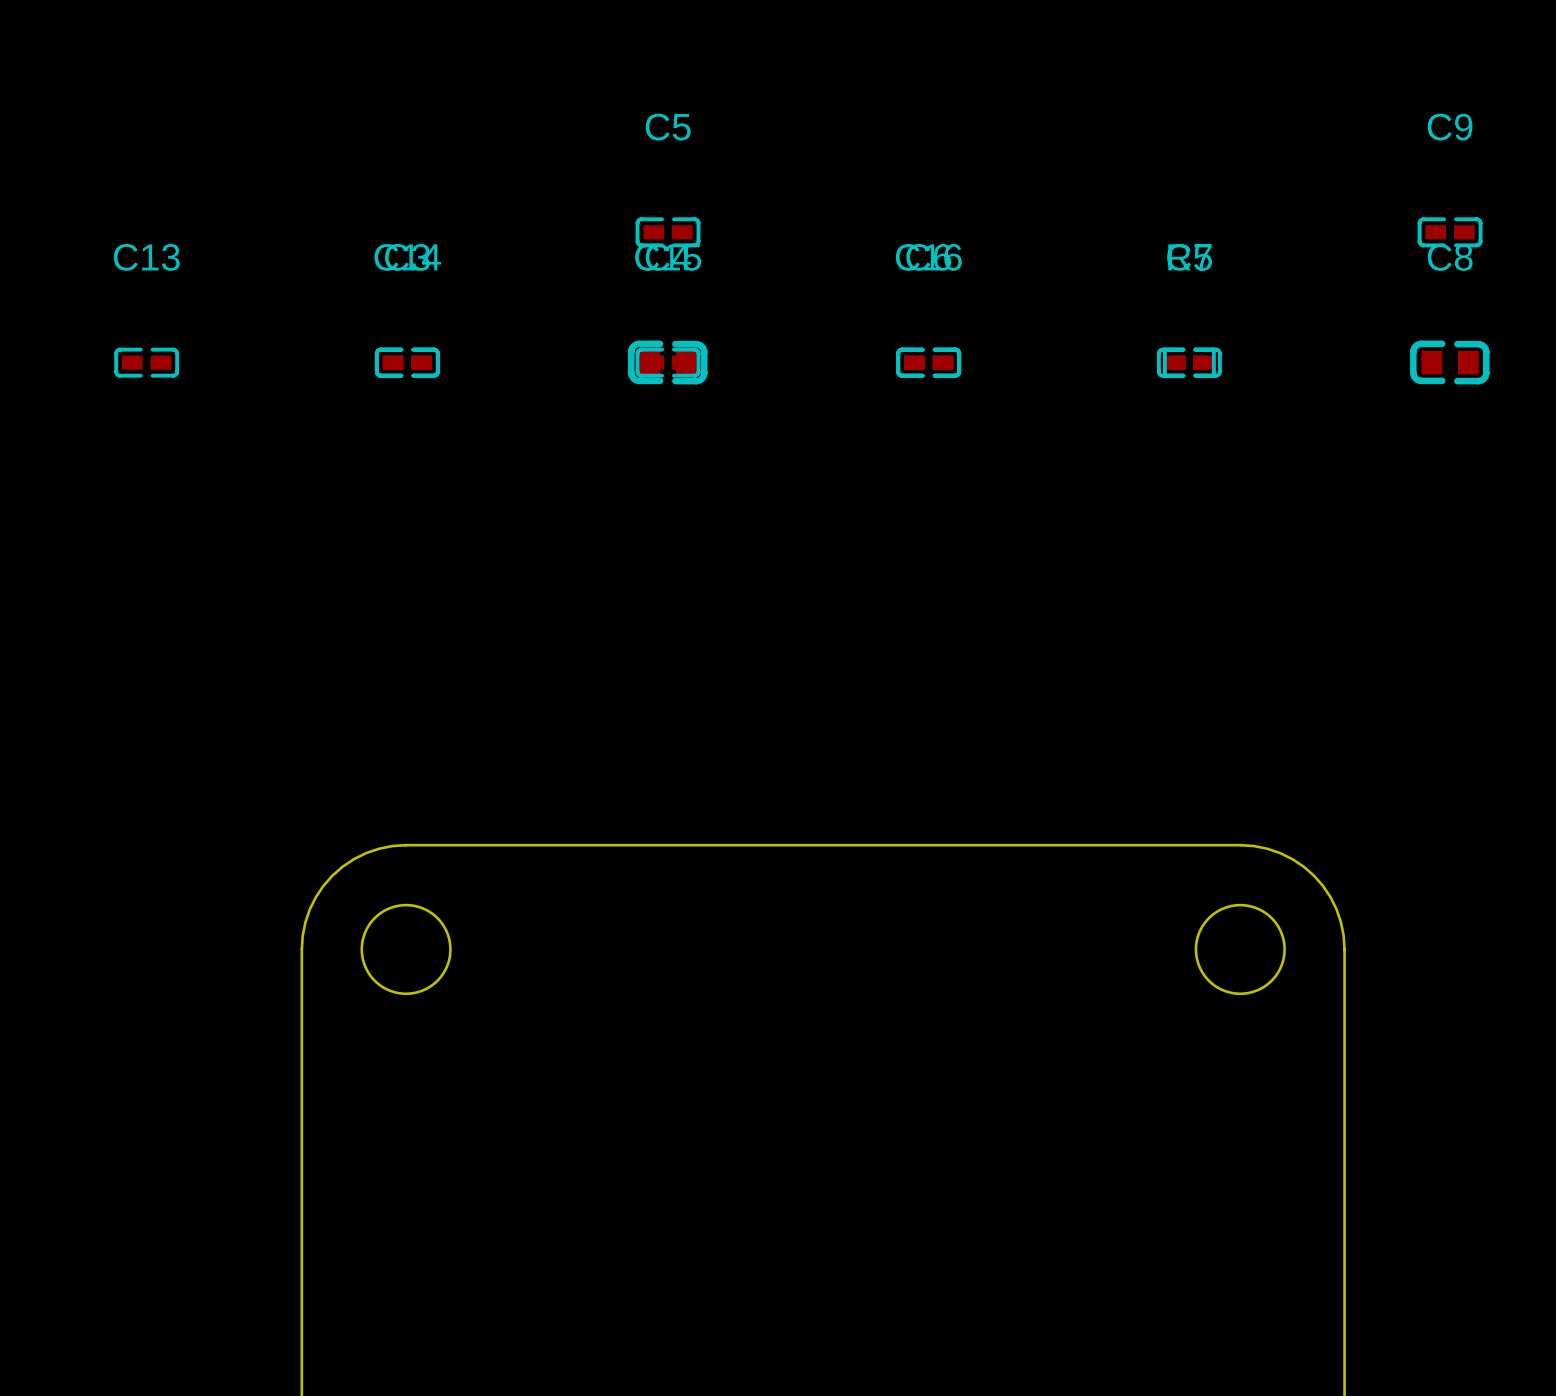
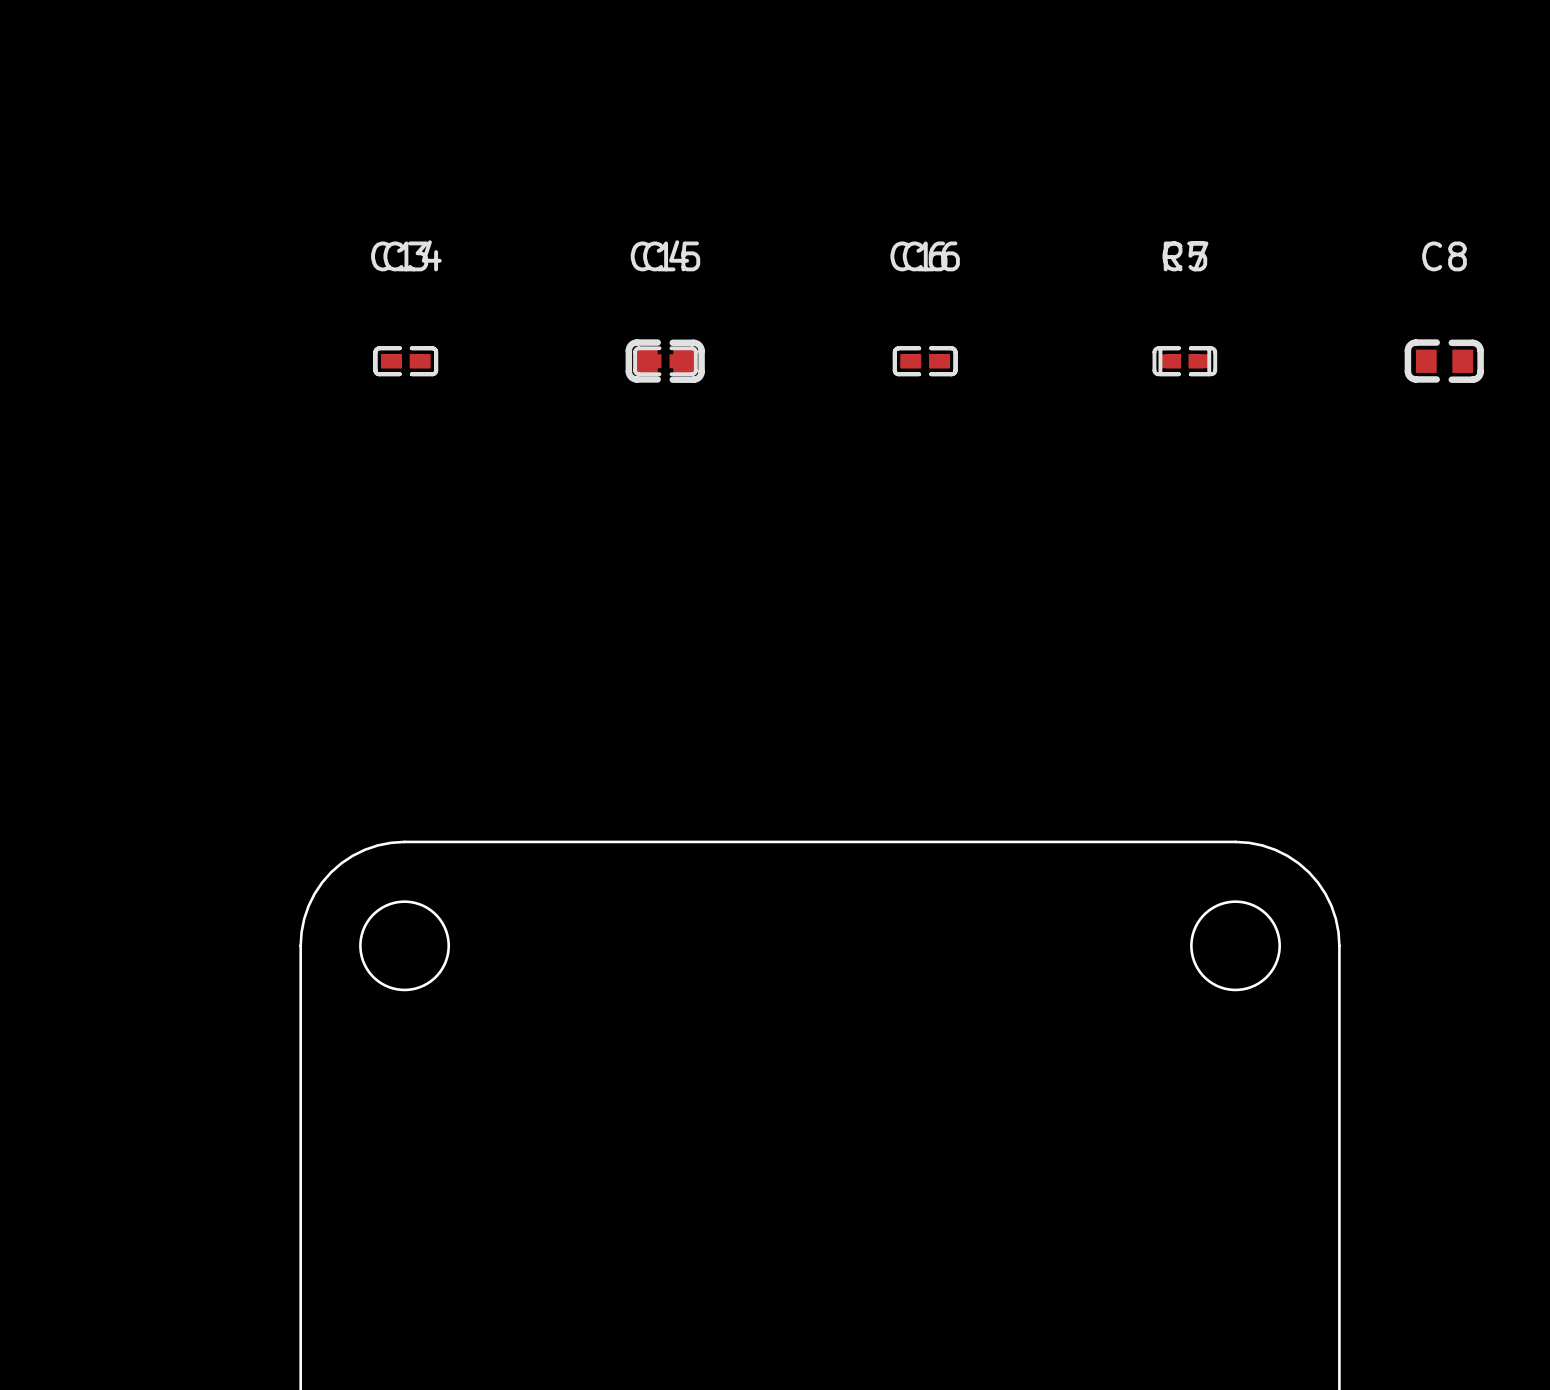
C5: (668, 232) -> none
C9: (1450, 232) -> none
C13: (146, 362) -> none

